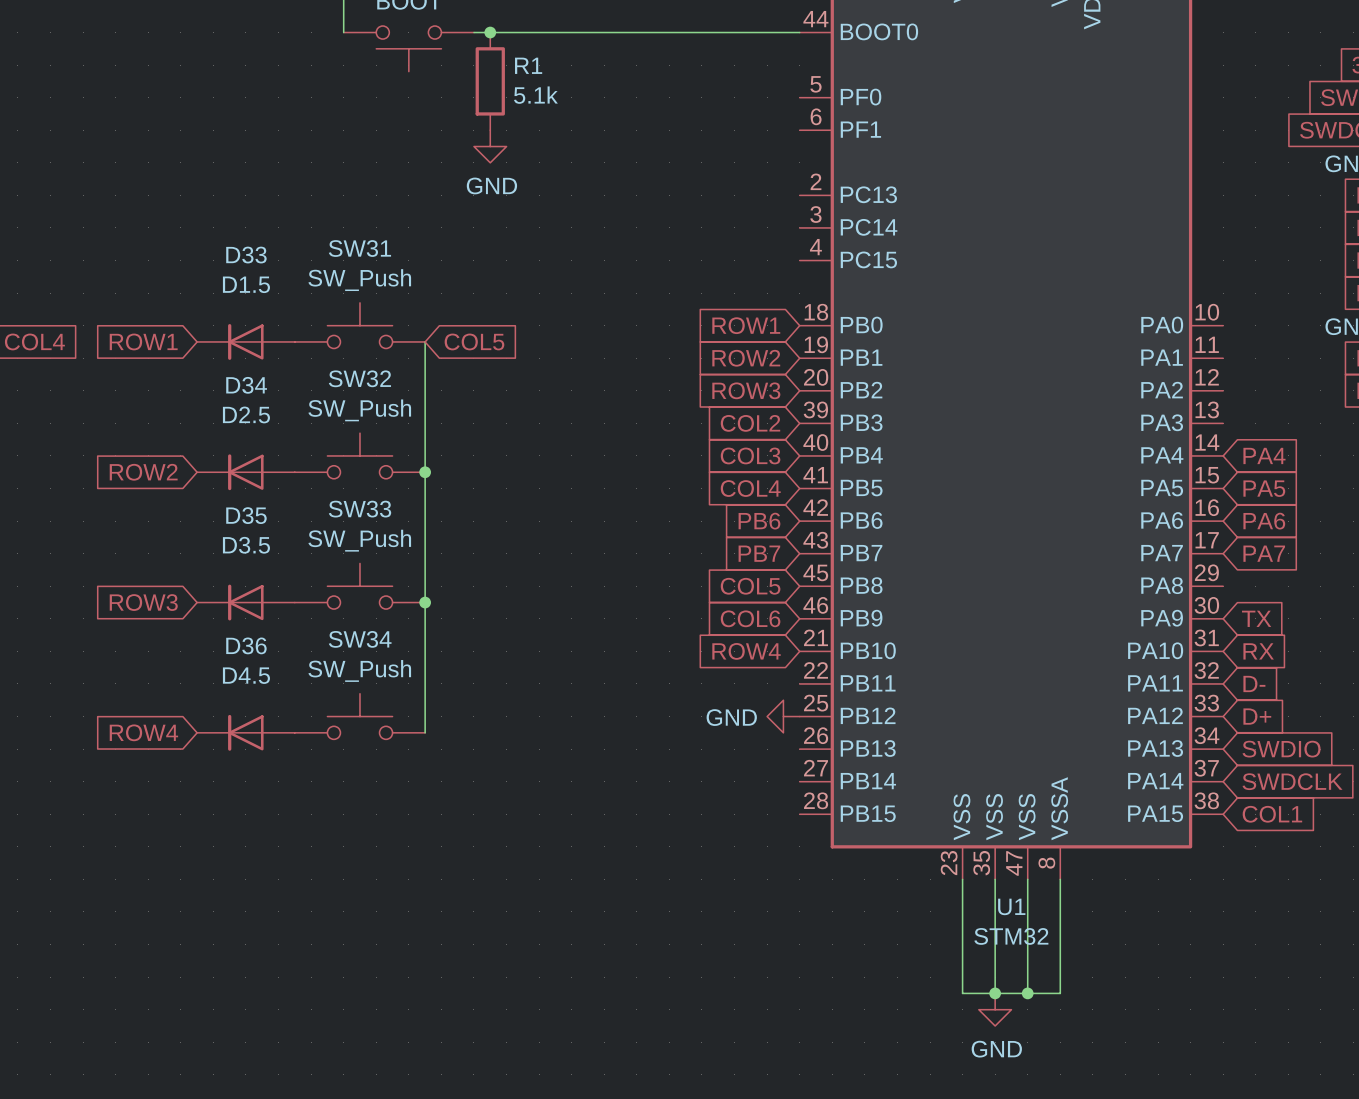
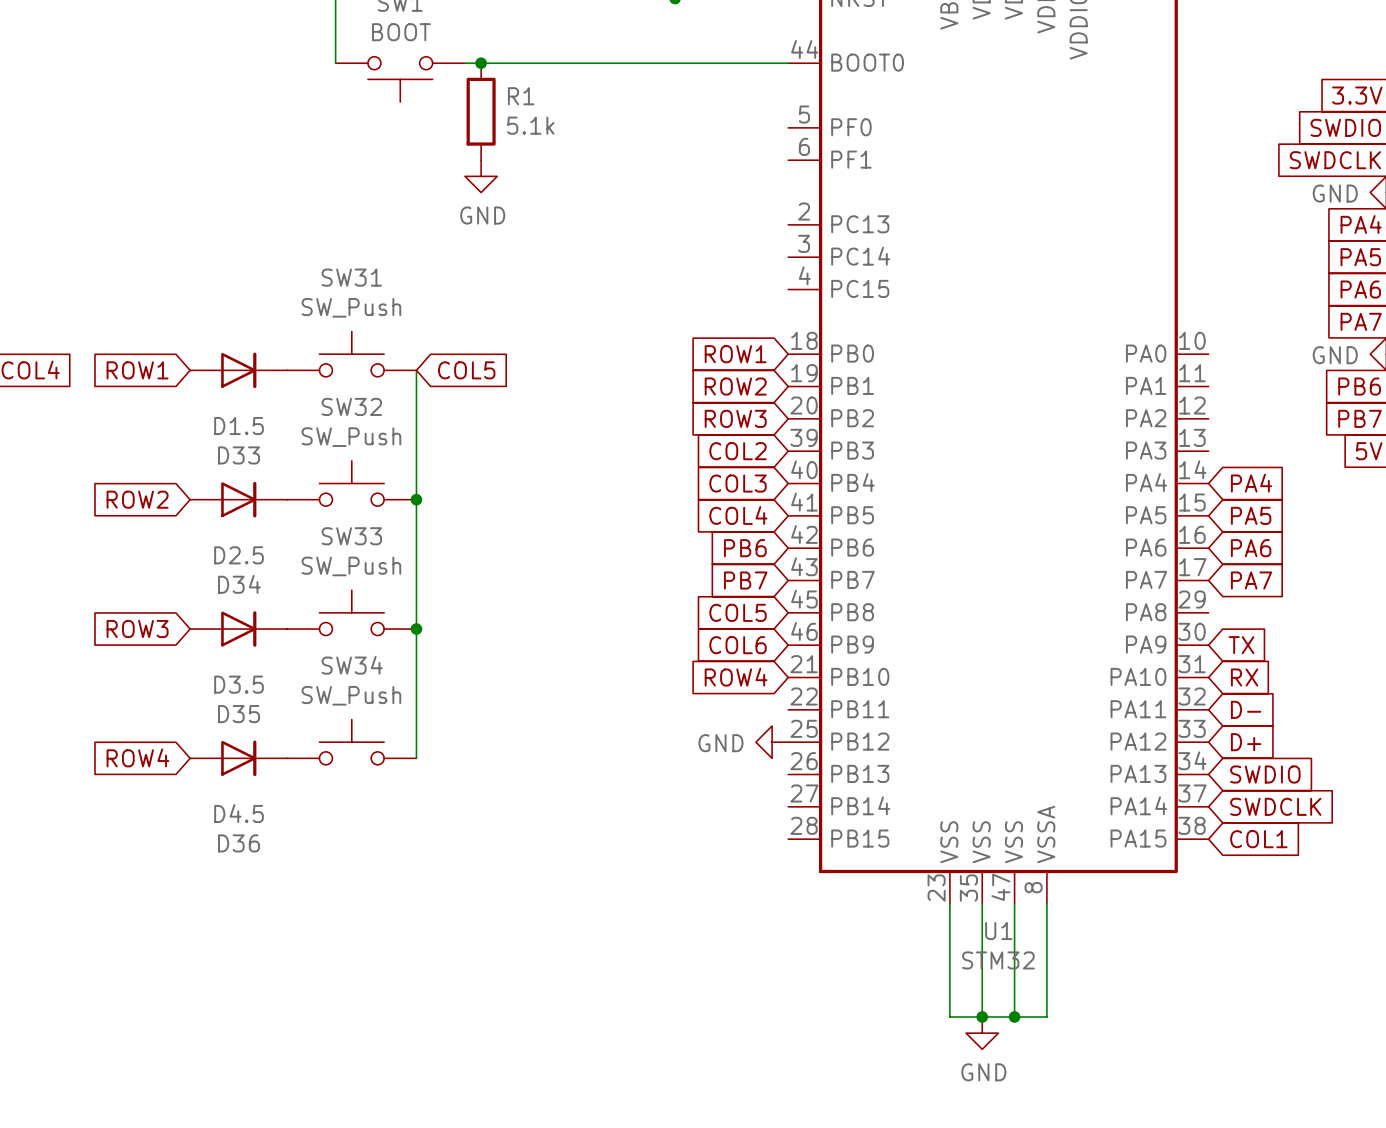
D33 rotation: 0° (245, 341) -> 180° (238, 370)
D34 rotation: 0° (245, 472) -> 180° (238, 499)
D35 rotation: 0° (245, 602) -> 180° (238, 629)
D36 rotation: 0° (245, 732) -> 180° (238, 758)

